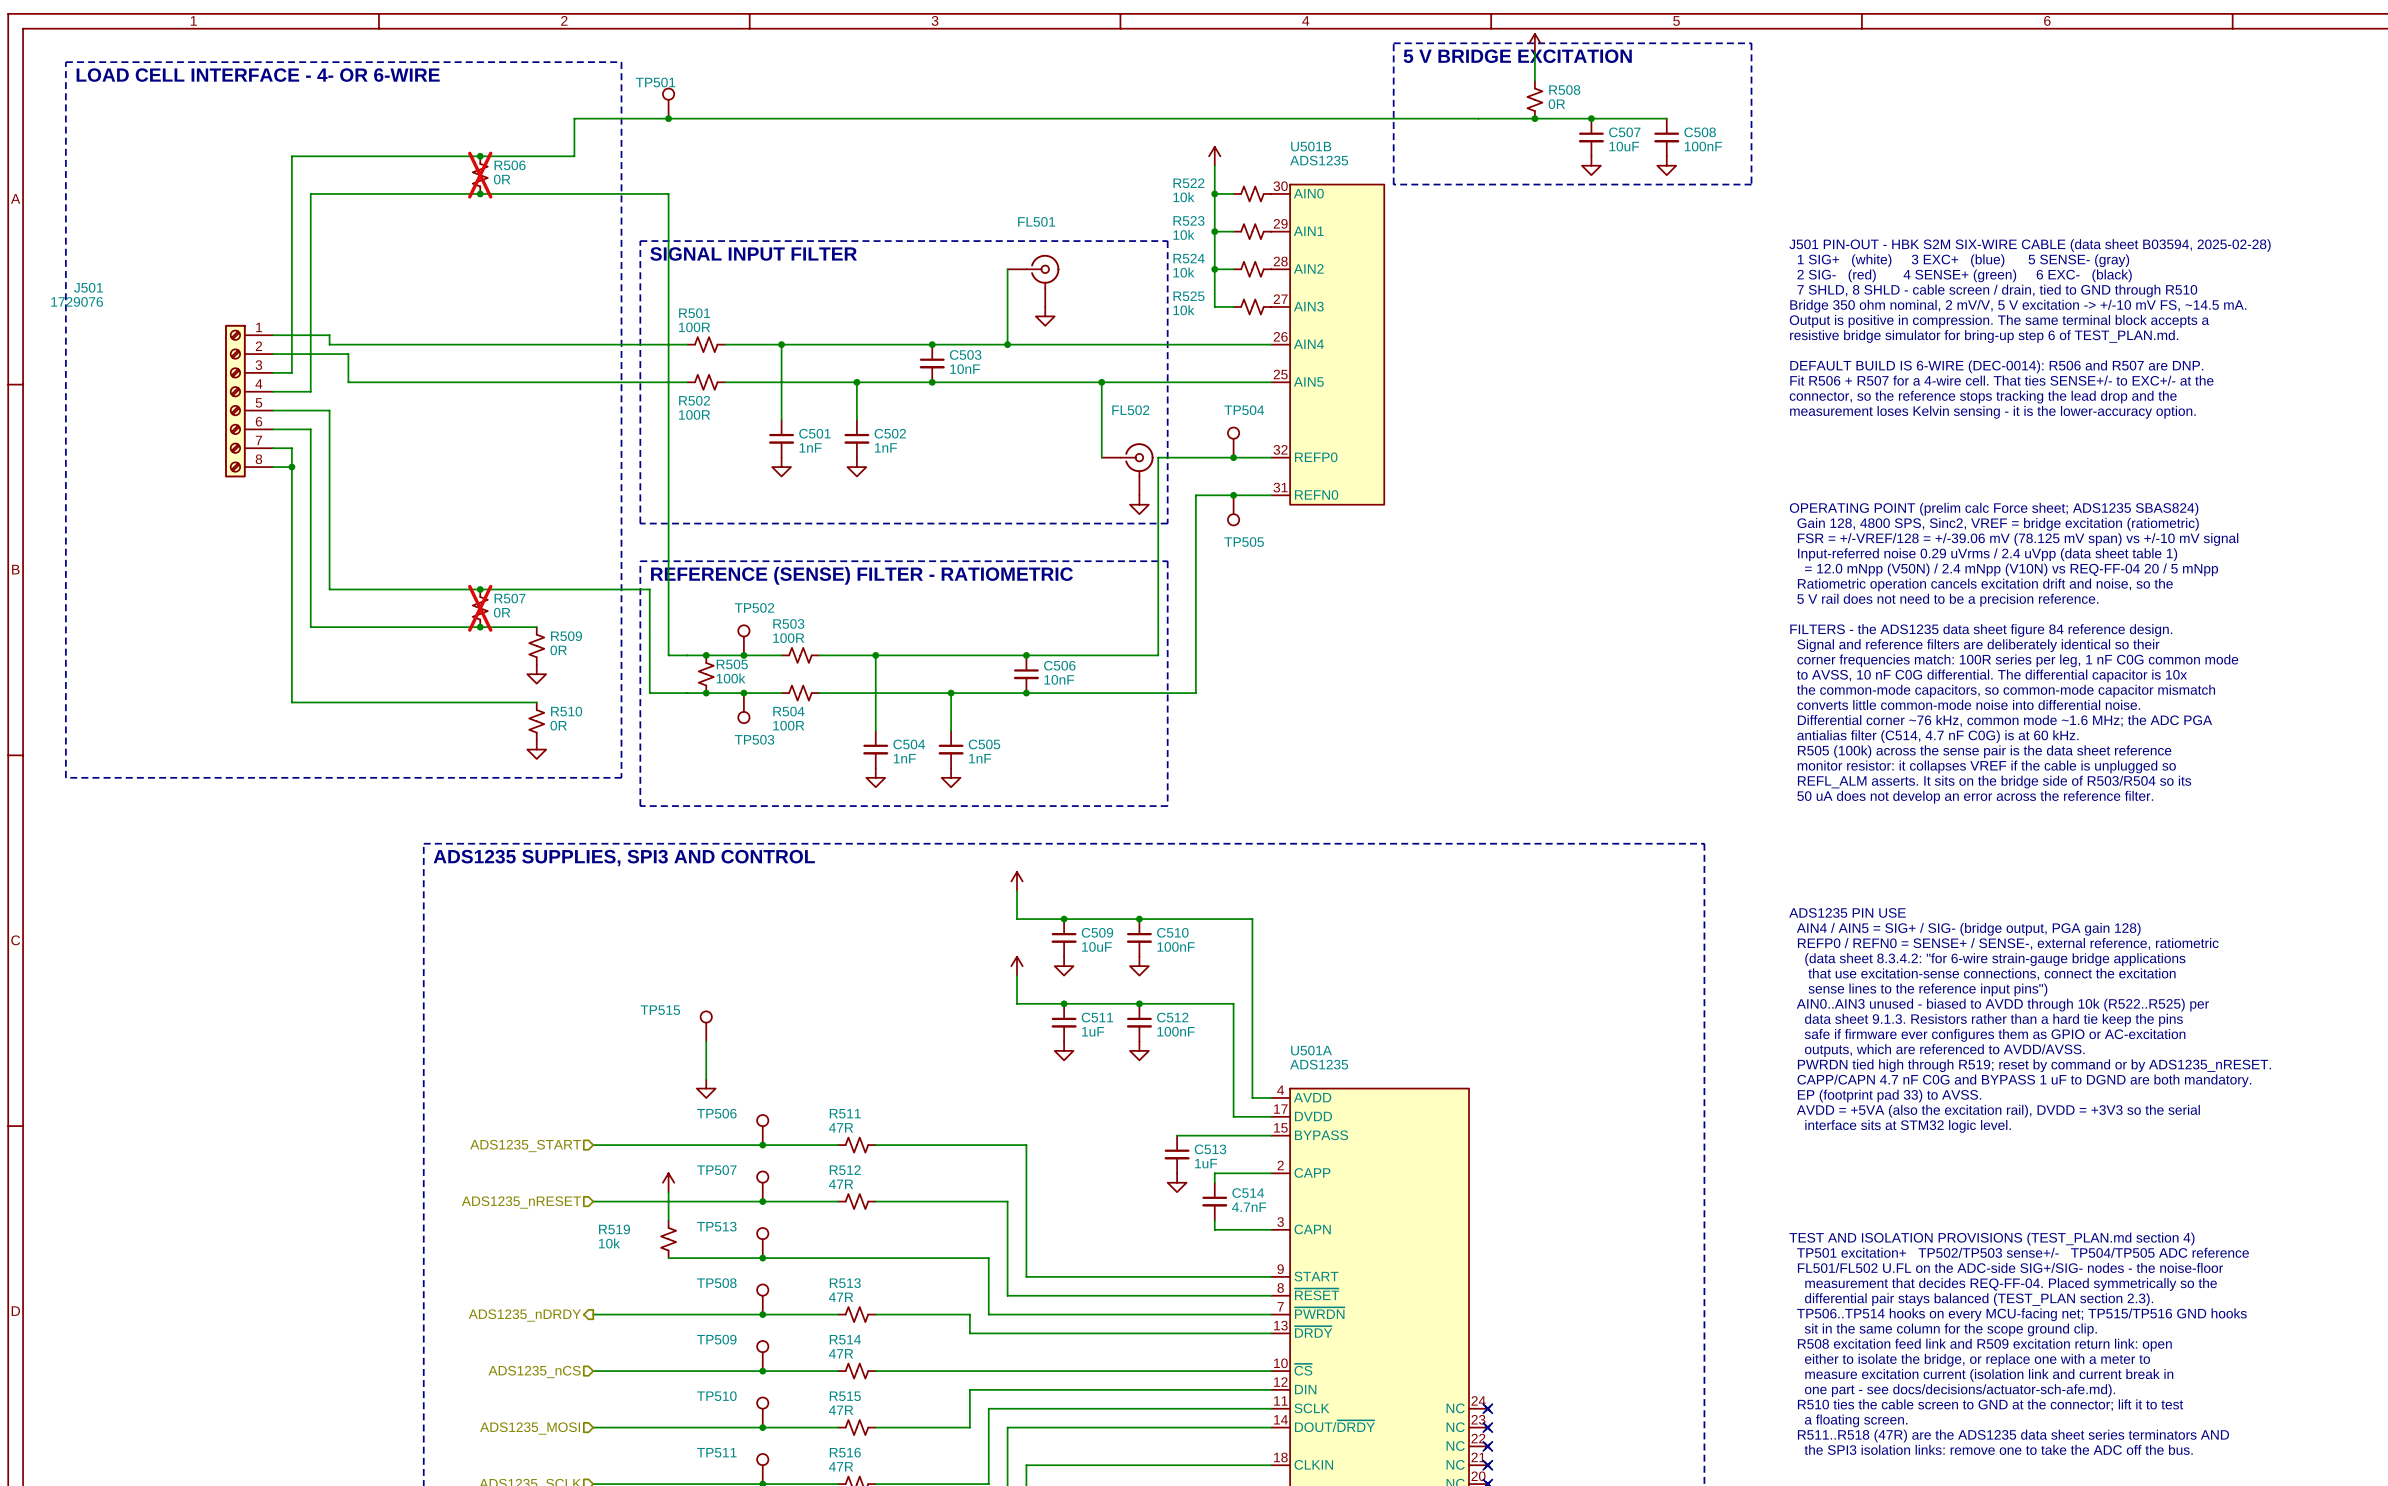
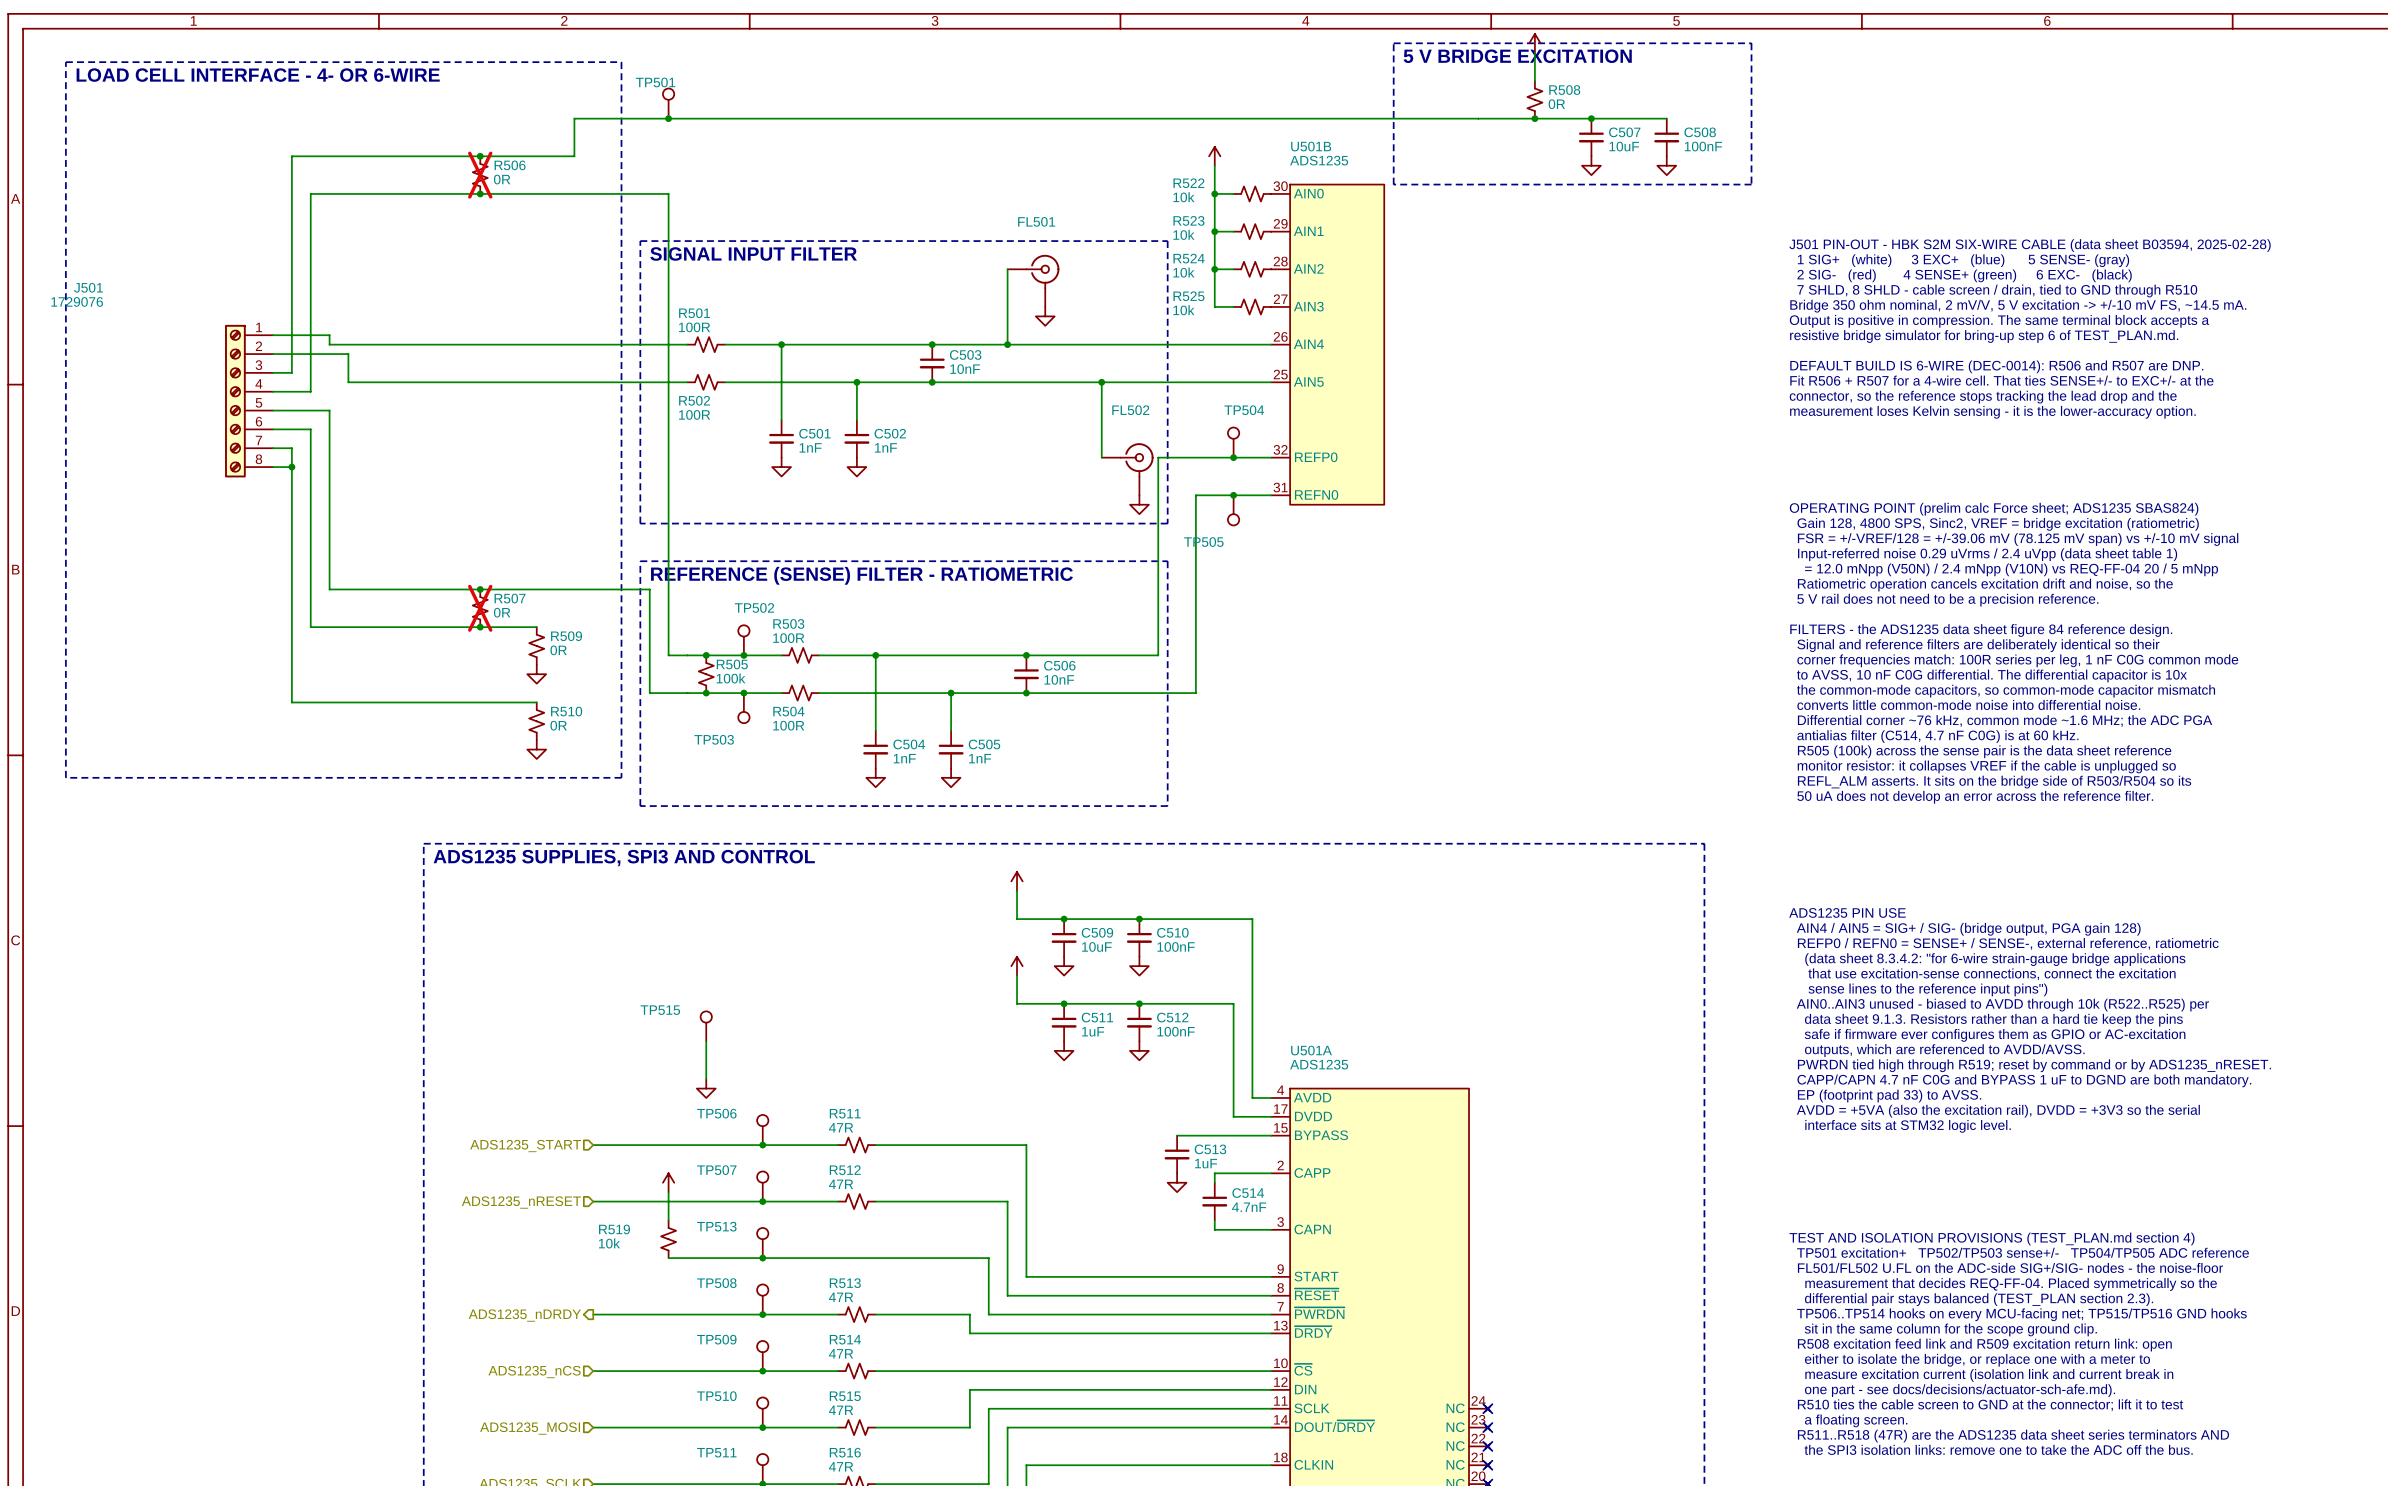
TP505 name position: TP505 (1244, 542) -> TP505 (1203, 542)
TP503 name position: TP503 (754, 739) -> TP503 (714, 739)

